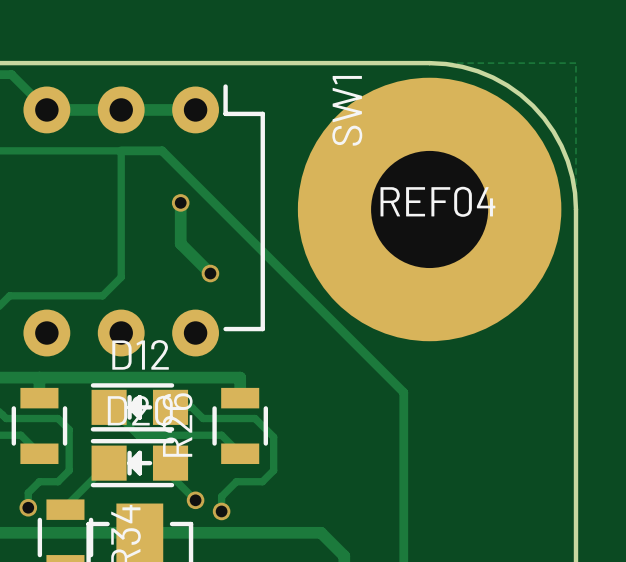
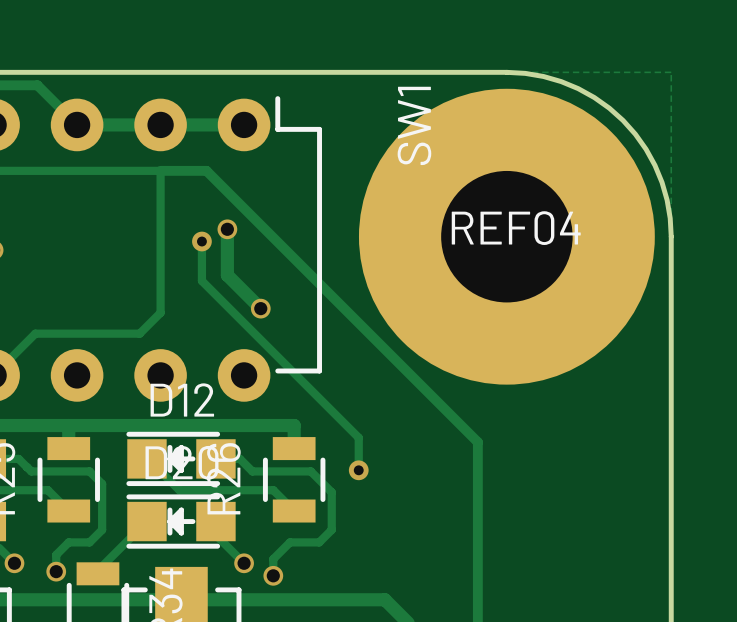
track: none -> (201, 241) (201, 280) (358, 437) (358, 470)
via: none -> (201, 241)
via: none -> (358, 470)

